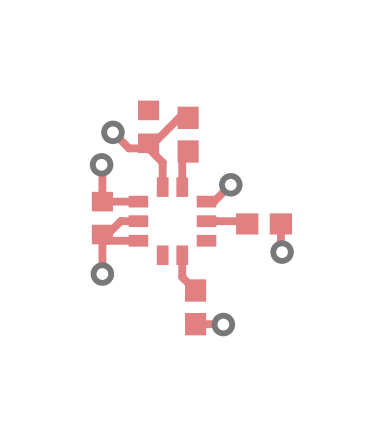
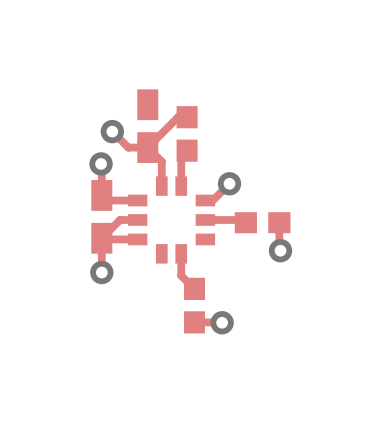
part footprint: [138, 100, 160, 154] -> [137, 89, 159, 163]
part footprint: [91, 191, 113, 245] -> [91, 180, 113, 254]

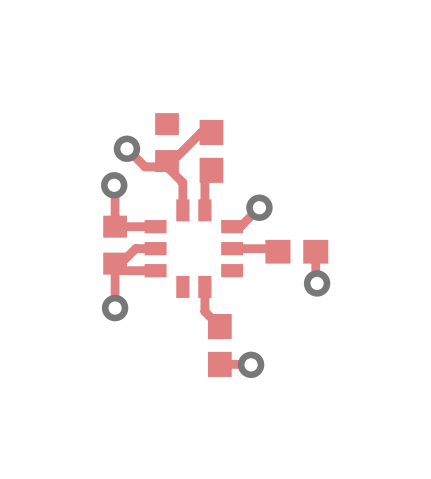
part footprint: [137, 89, 159, 163] -> [155, 113, 179, 173]
part footprint: [91, 180, 113, 254] -> [103, 215, 127, 275]

